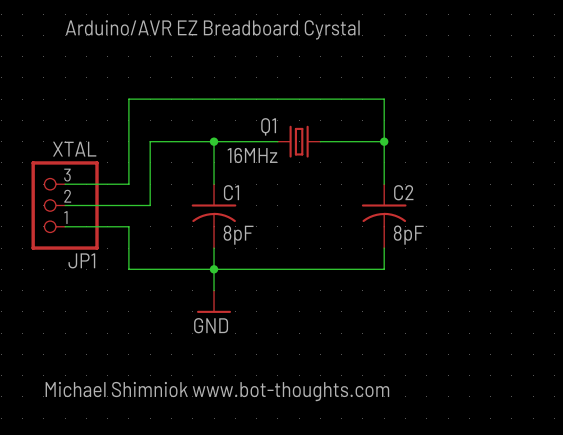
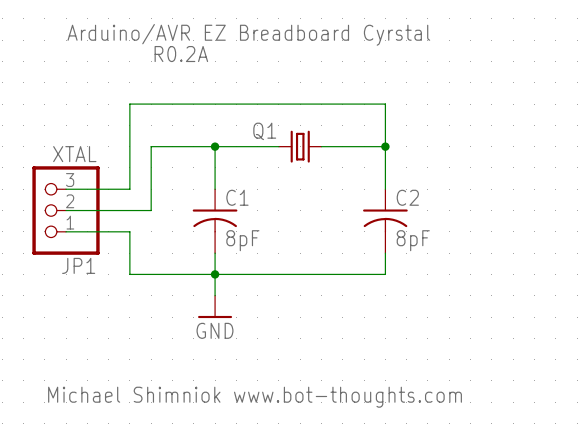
text: none -> R0.2A (181, 54)
Q1 value: 16MHz (252, 155) -> none

